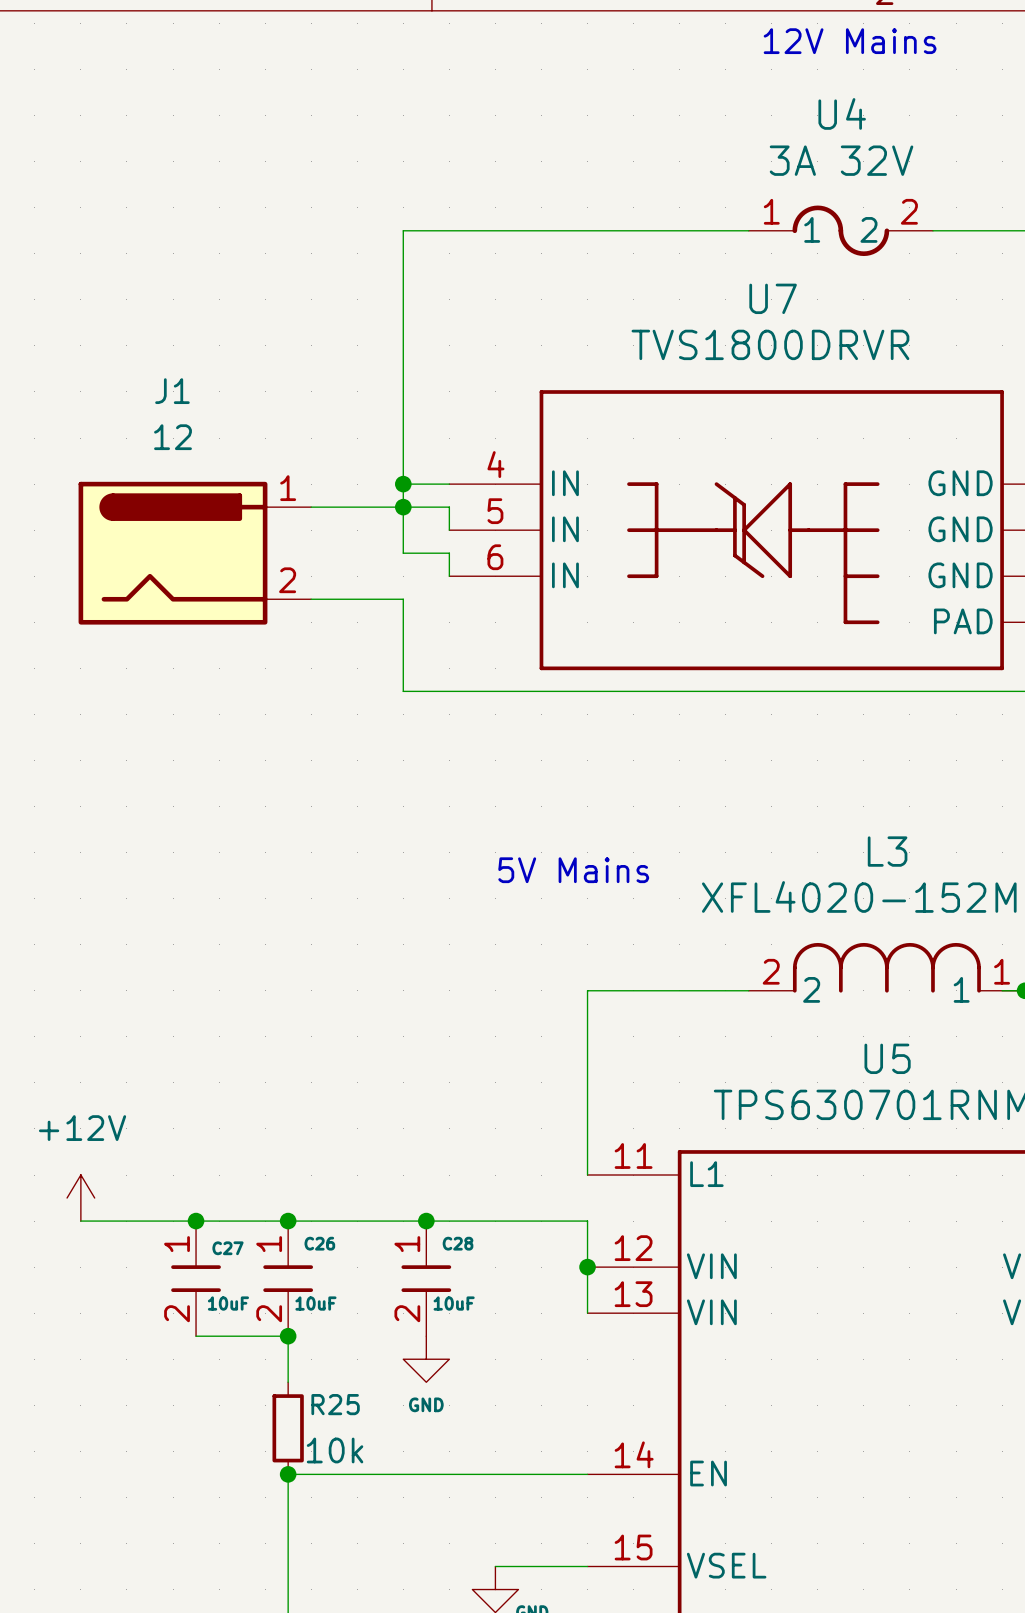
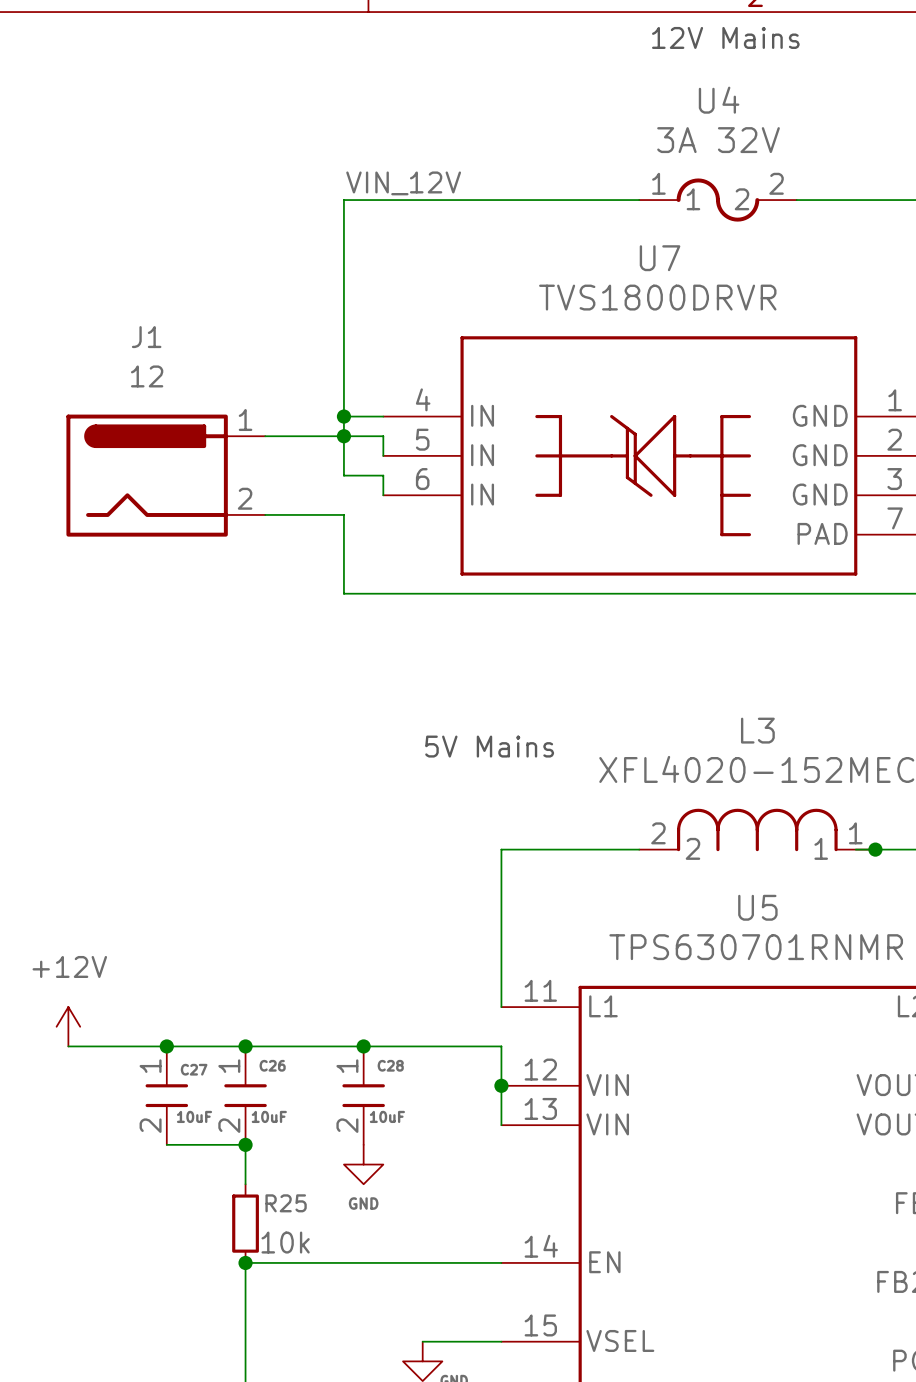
label: none -> VIN_12V (403, 183)

